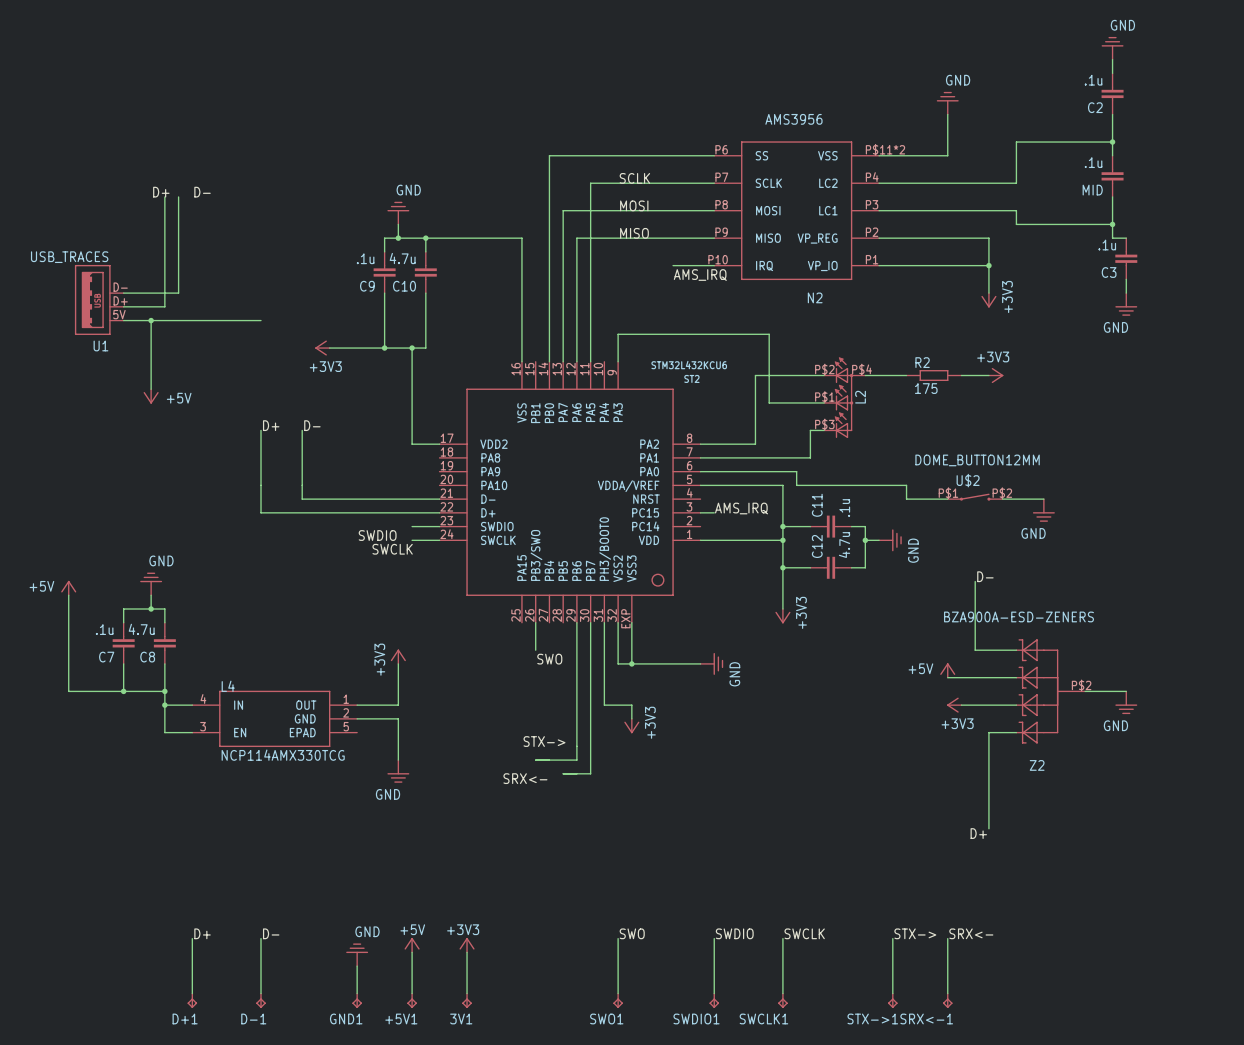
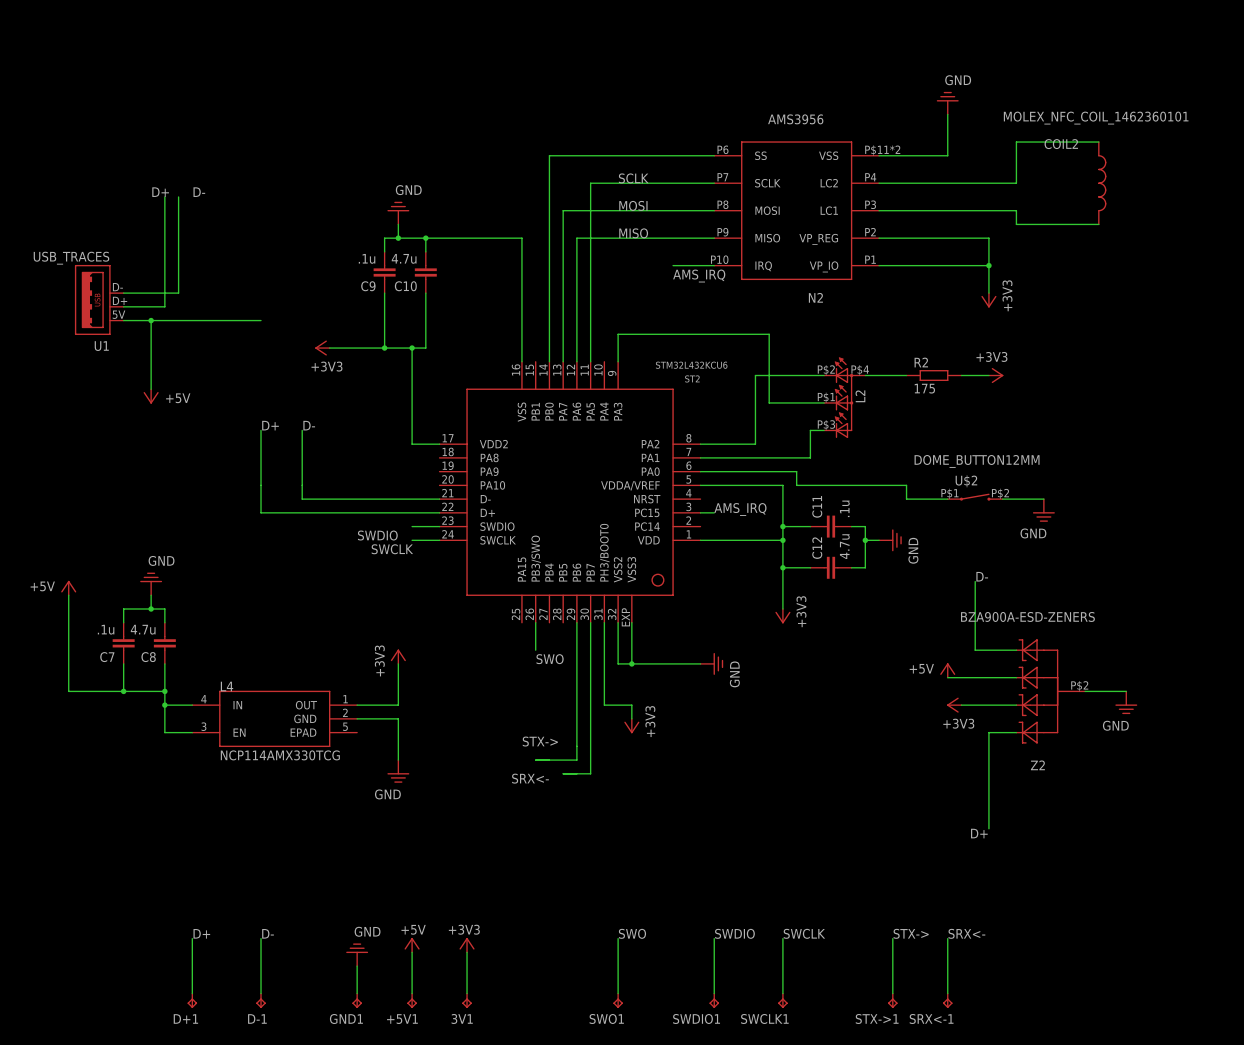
power symbol: GND (1112, 48) -> none
wire: (1112, 59) (1112, 73) -> none
C2: .1u (1112, 93) -> none
wire: (1112, 114) (1112, 155) -> none
wire: (1098, 142) (1112, 142) -> none
junction: (1112, 142) -> none
MID: .1u (1112, 176) -> none
COIL2: none -> MOLEX_NFC_COIL_1462360101 (1102, 183)
wire: (1112, 196) (1112, 238) (1126, 238) -> none
wire: (1098, 224) (1112, 224) -> none
junction: (1112, 224) -> none
C3: .1u (1126, 258) -> none
wire: (1126, 279) (1126, 293) -> none
power symbol: GND (1126, 304) -> none

